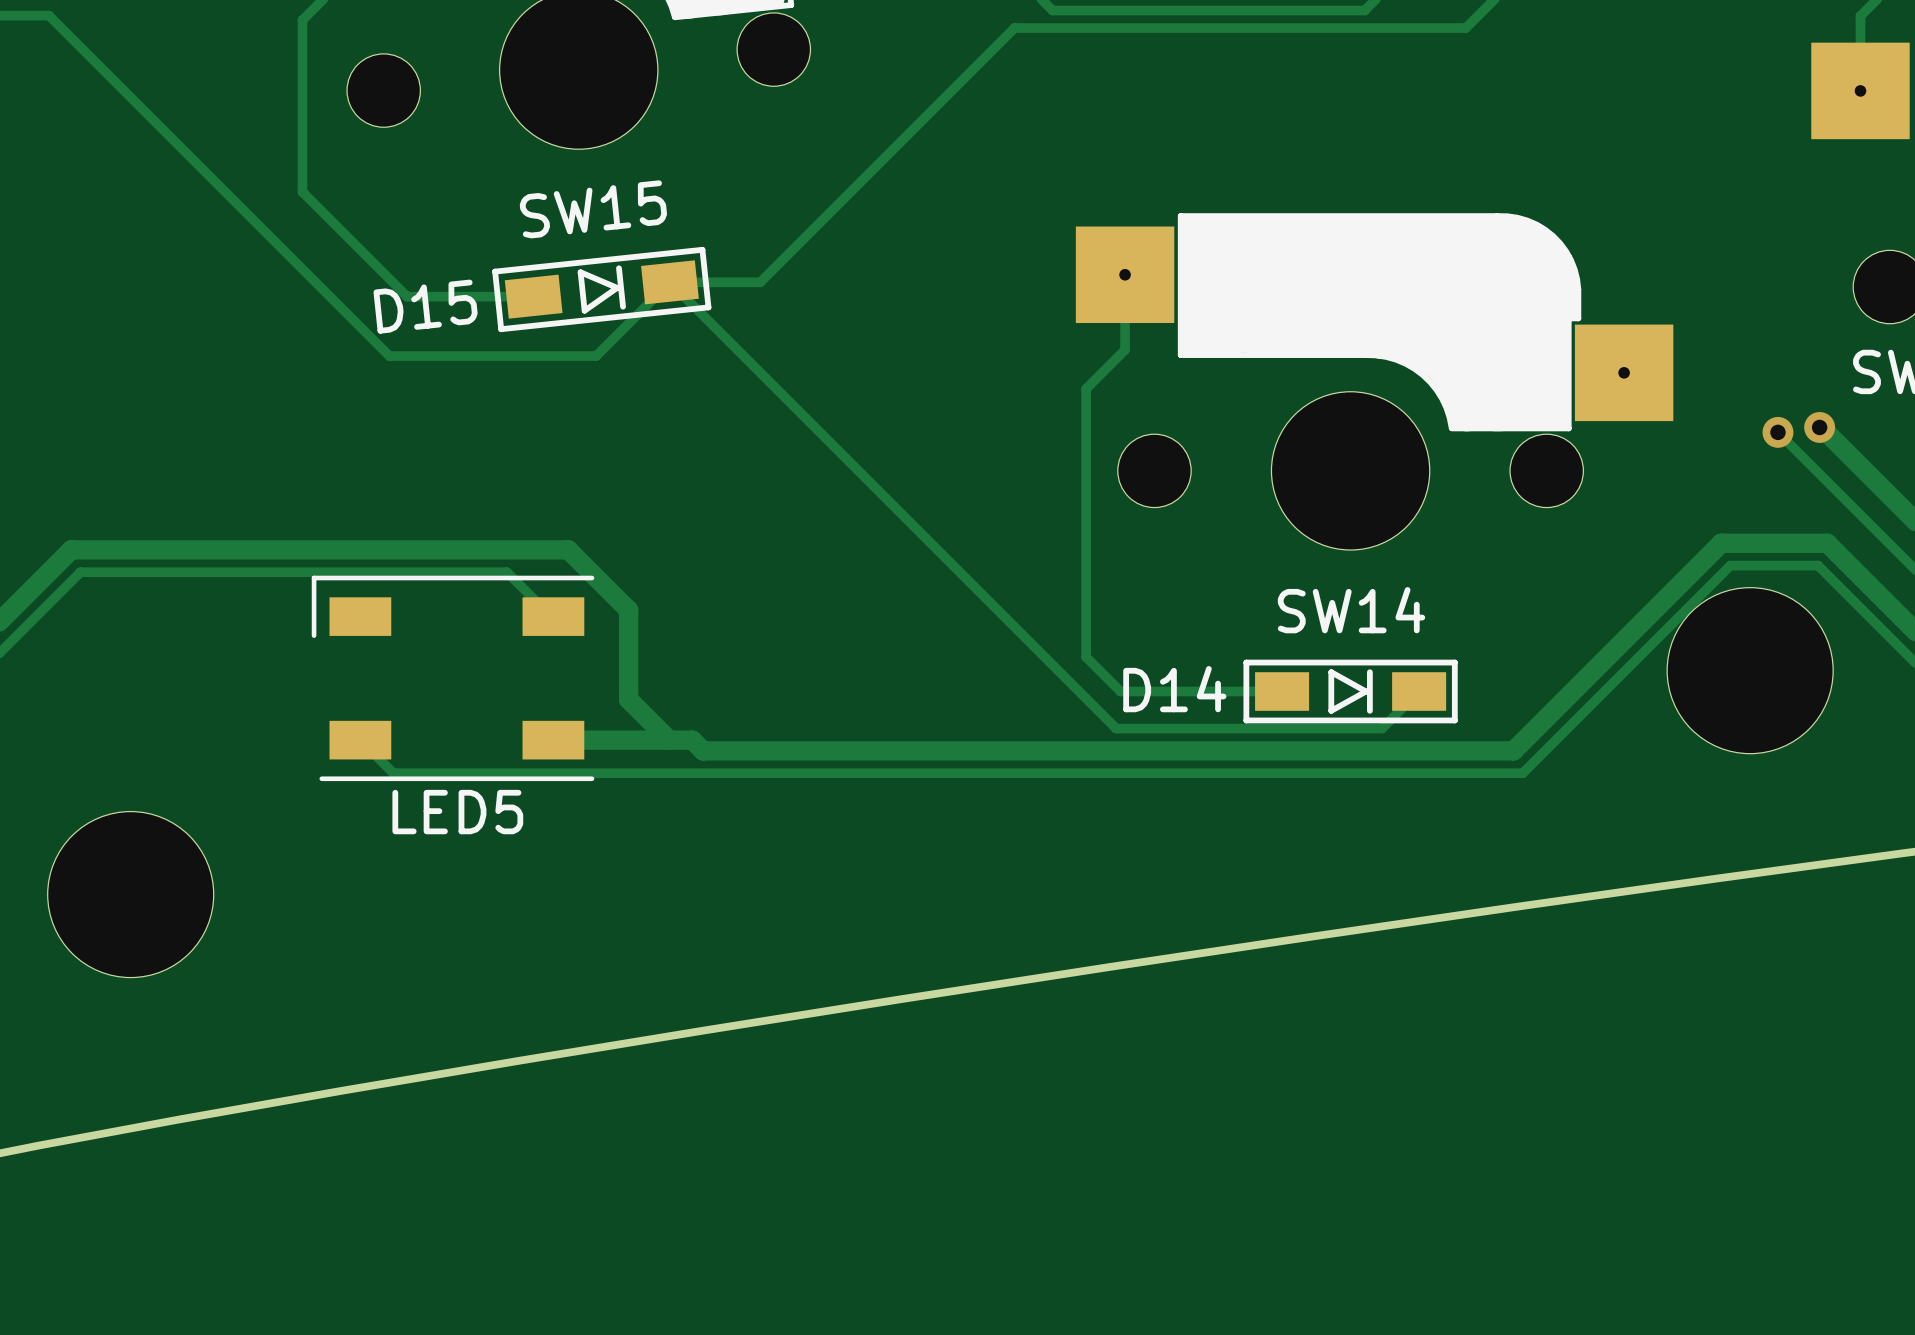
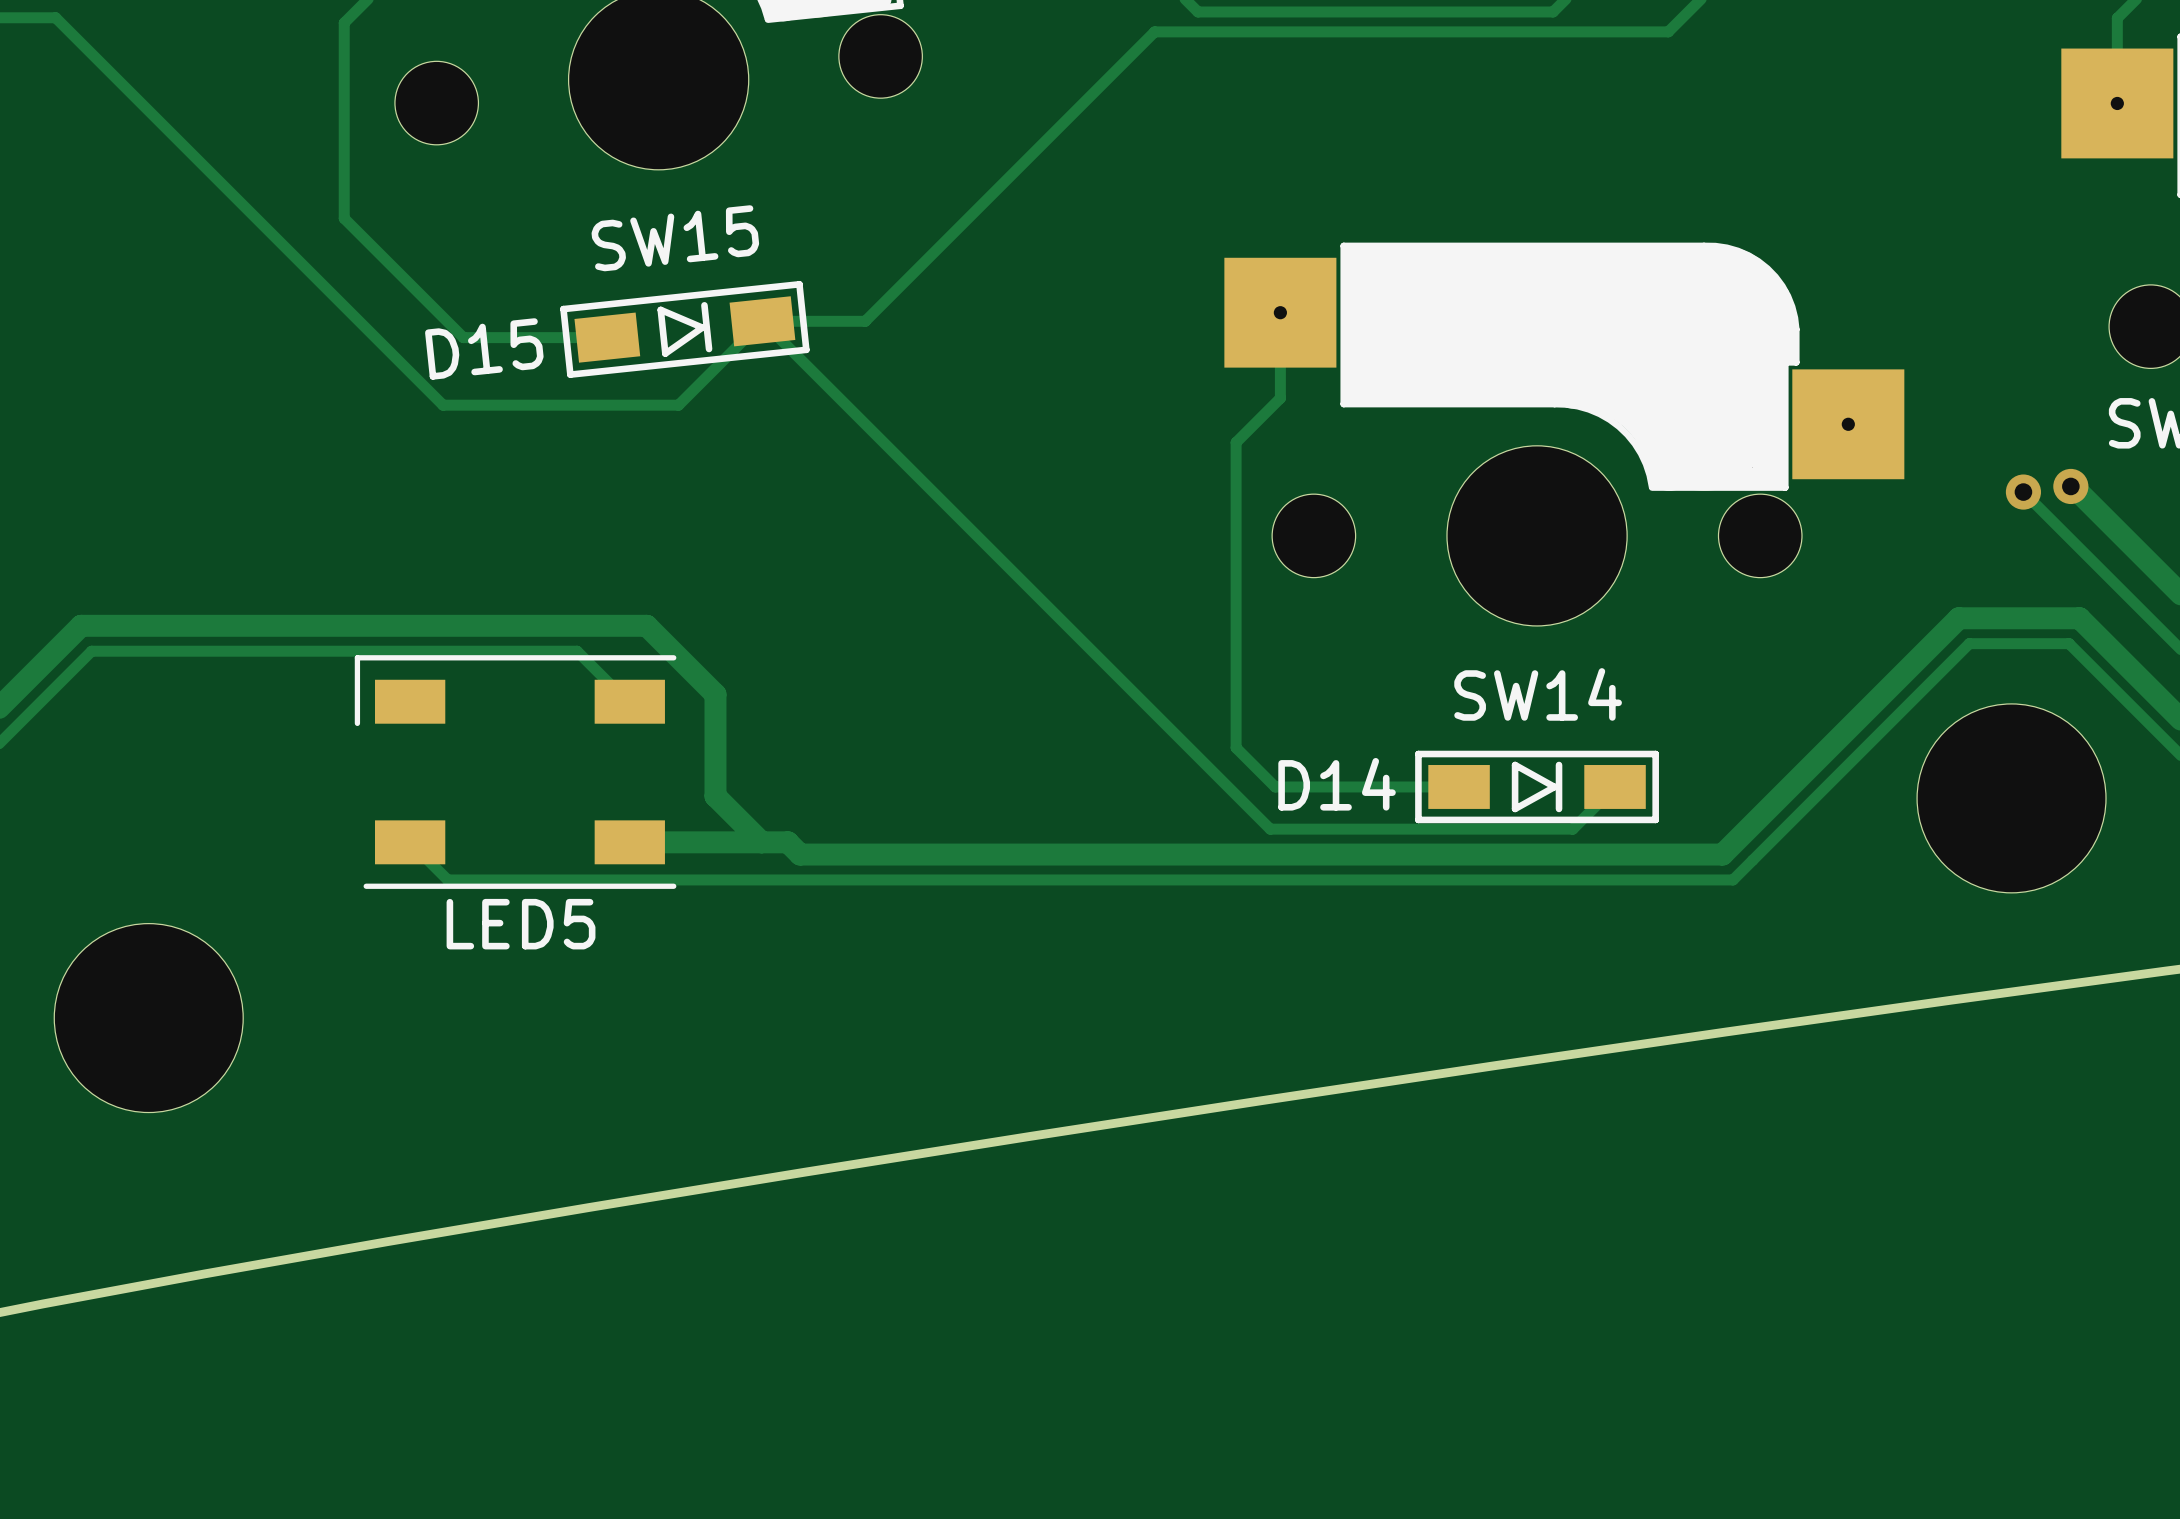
part position: (1750, 670) -> (2011, 798)

